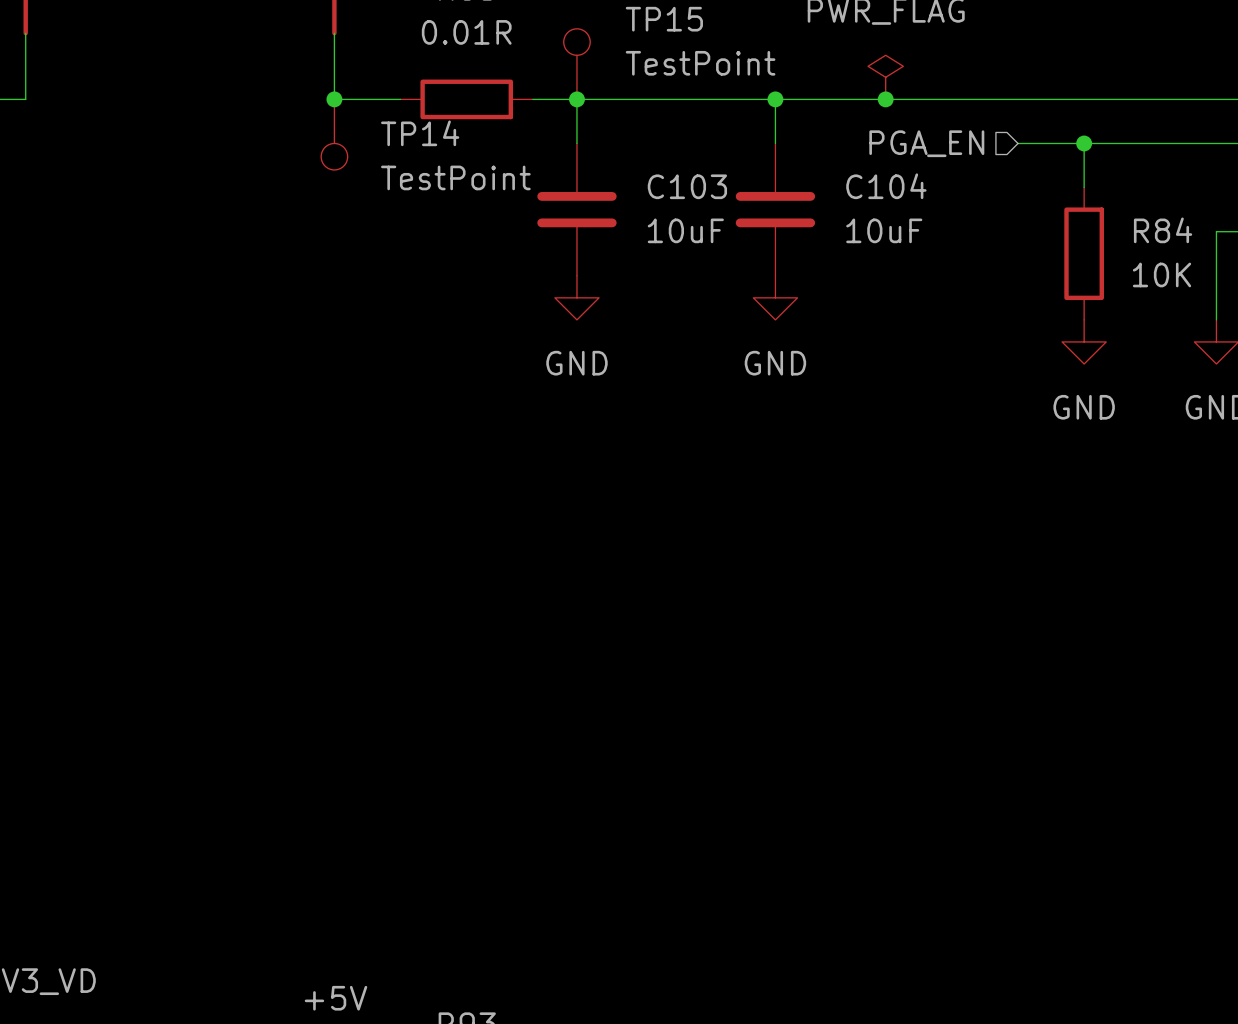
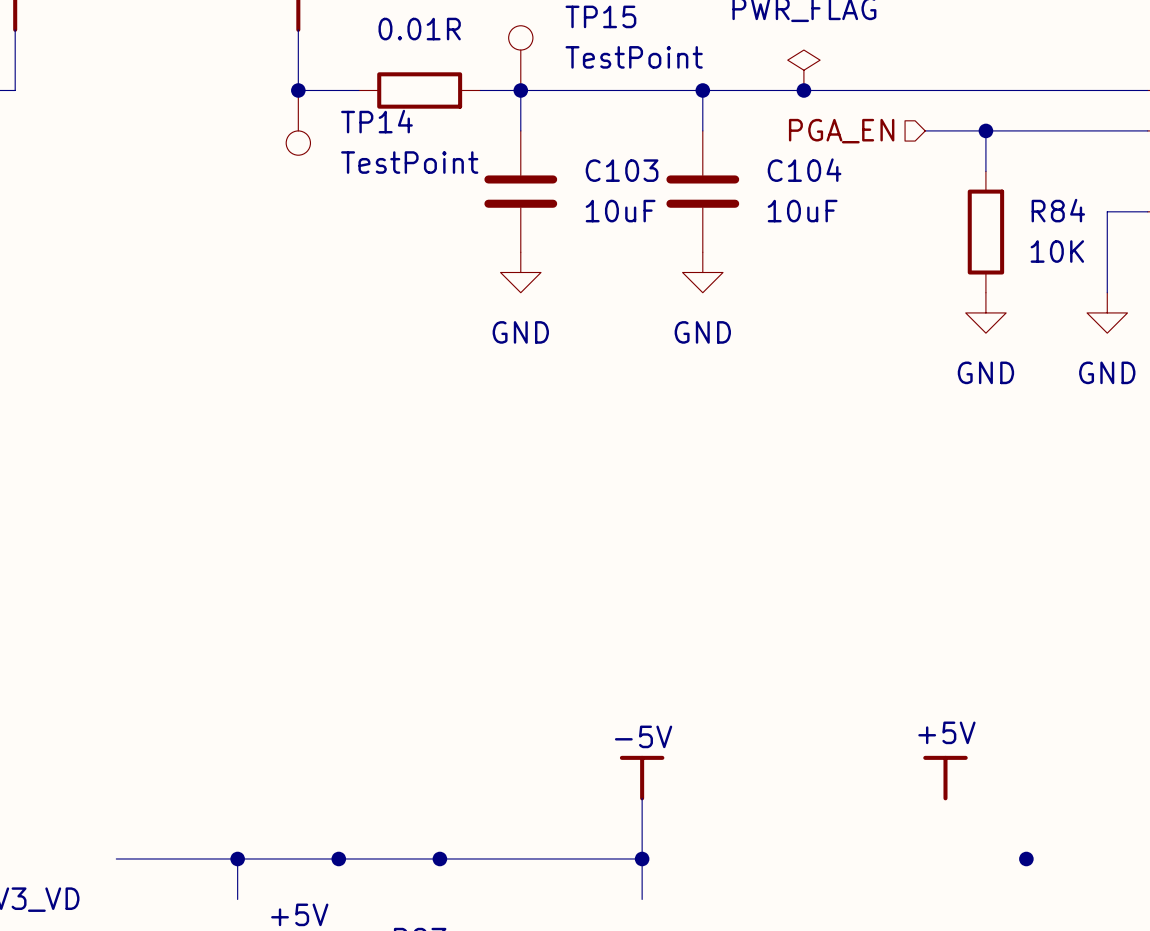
power symbol: none -> -5V (642, 778)
power symbol: none -> +5V (945, 778)
wire: none -> (642, 798) (642, 899)
wire: none -> (116, 858) (642, 858)
wire: none -> (237, 858) (237, 899)
junction: none -> (237, 858)
junction: none -> (338, 858)
junction: none -> (439, 858)
junction: none -> (642, 858)
junction: none -> (1026, 858)

